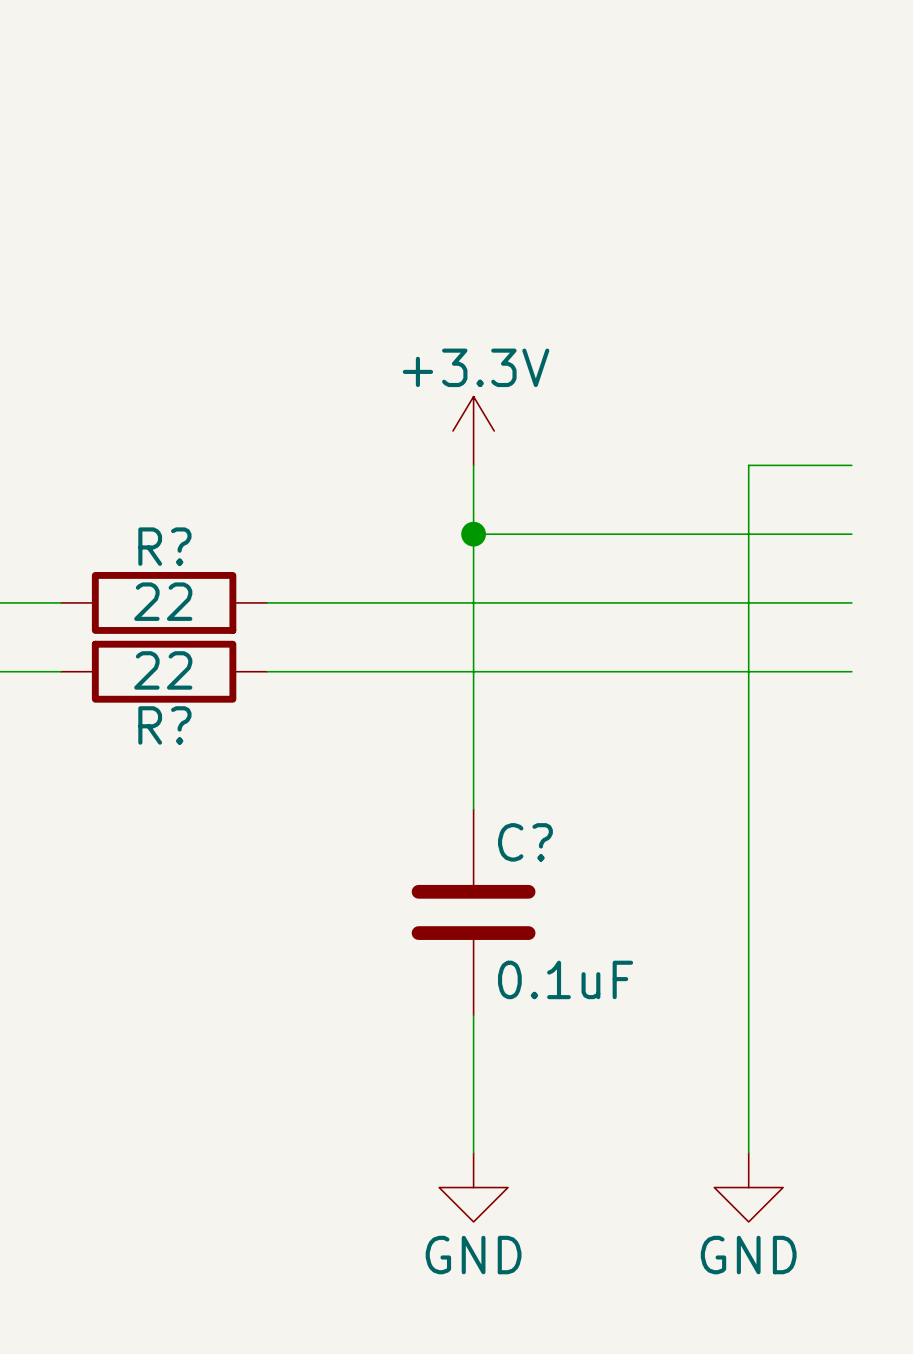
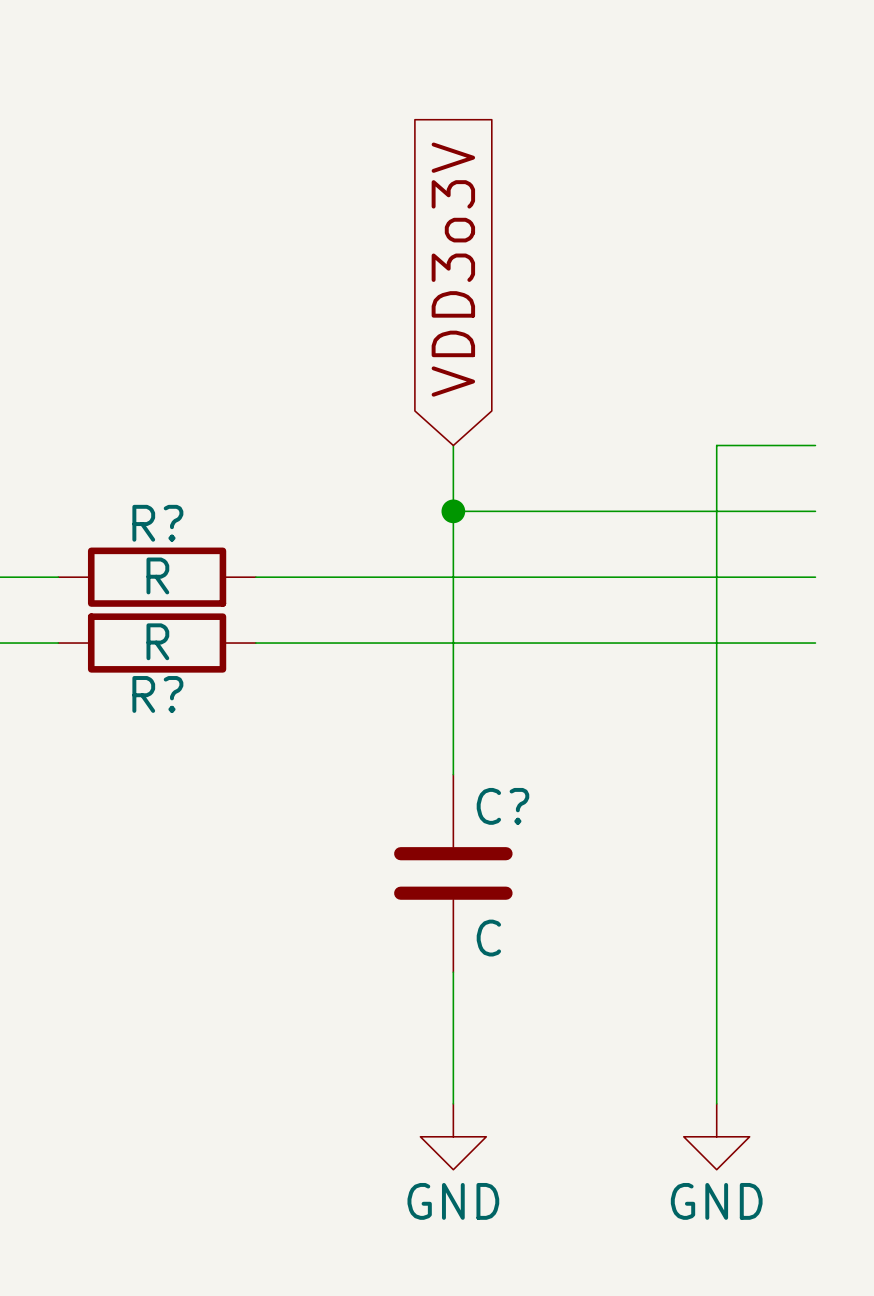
global label: none -> VDD3o3V (453, 269)
power symbol: +3.3V (473, 431) -> none
R? value: 22 (163, 601) -> R (157, 575)
R? value: 22 (163, 670) -> R (157, 641)
C? value: 0.1uF (565, 979) -> C (488, 938)

